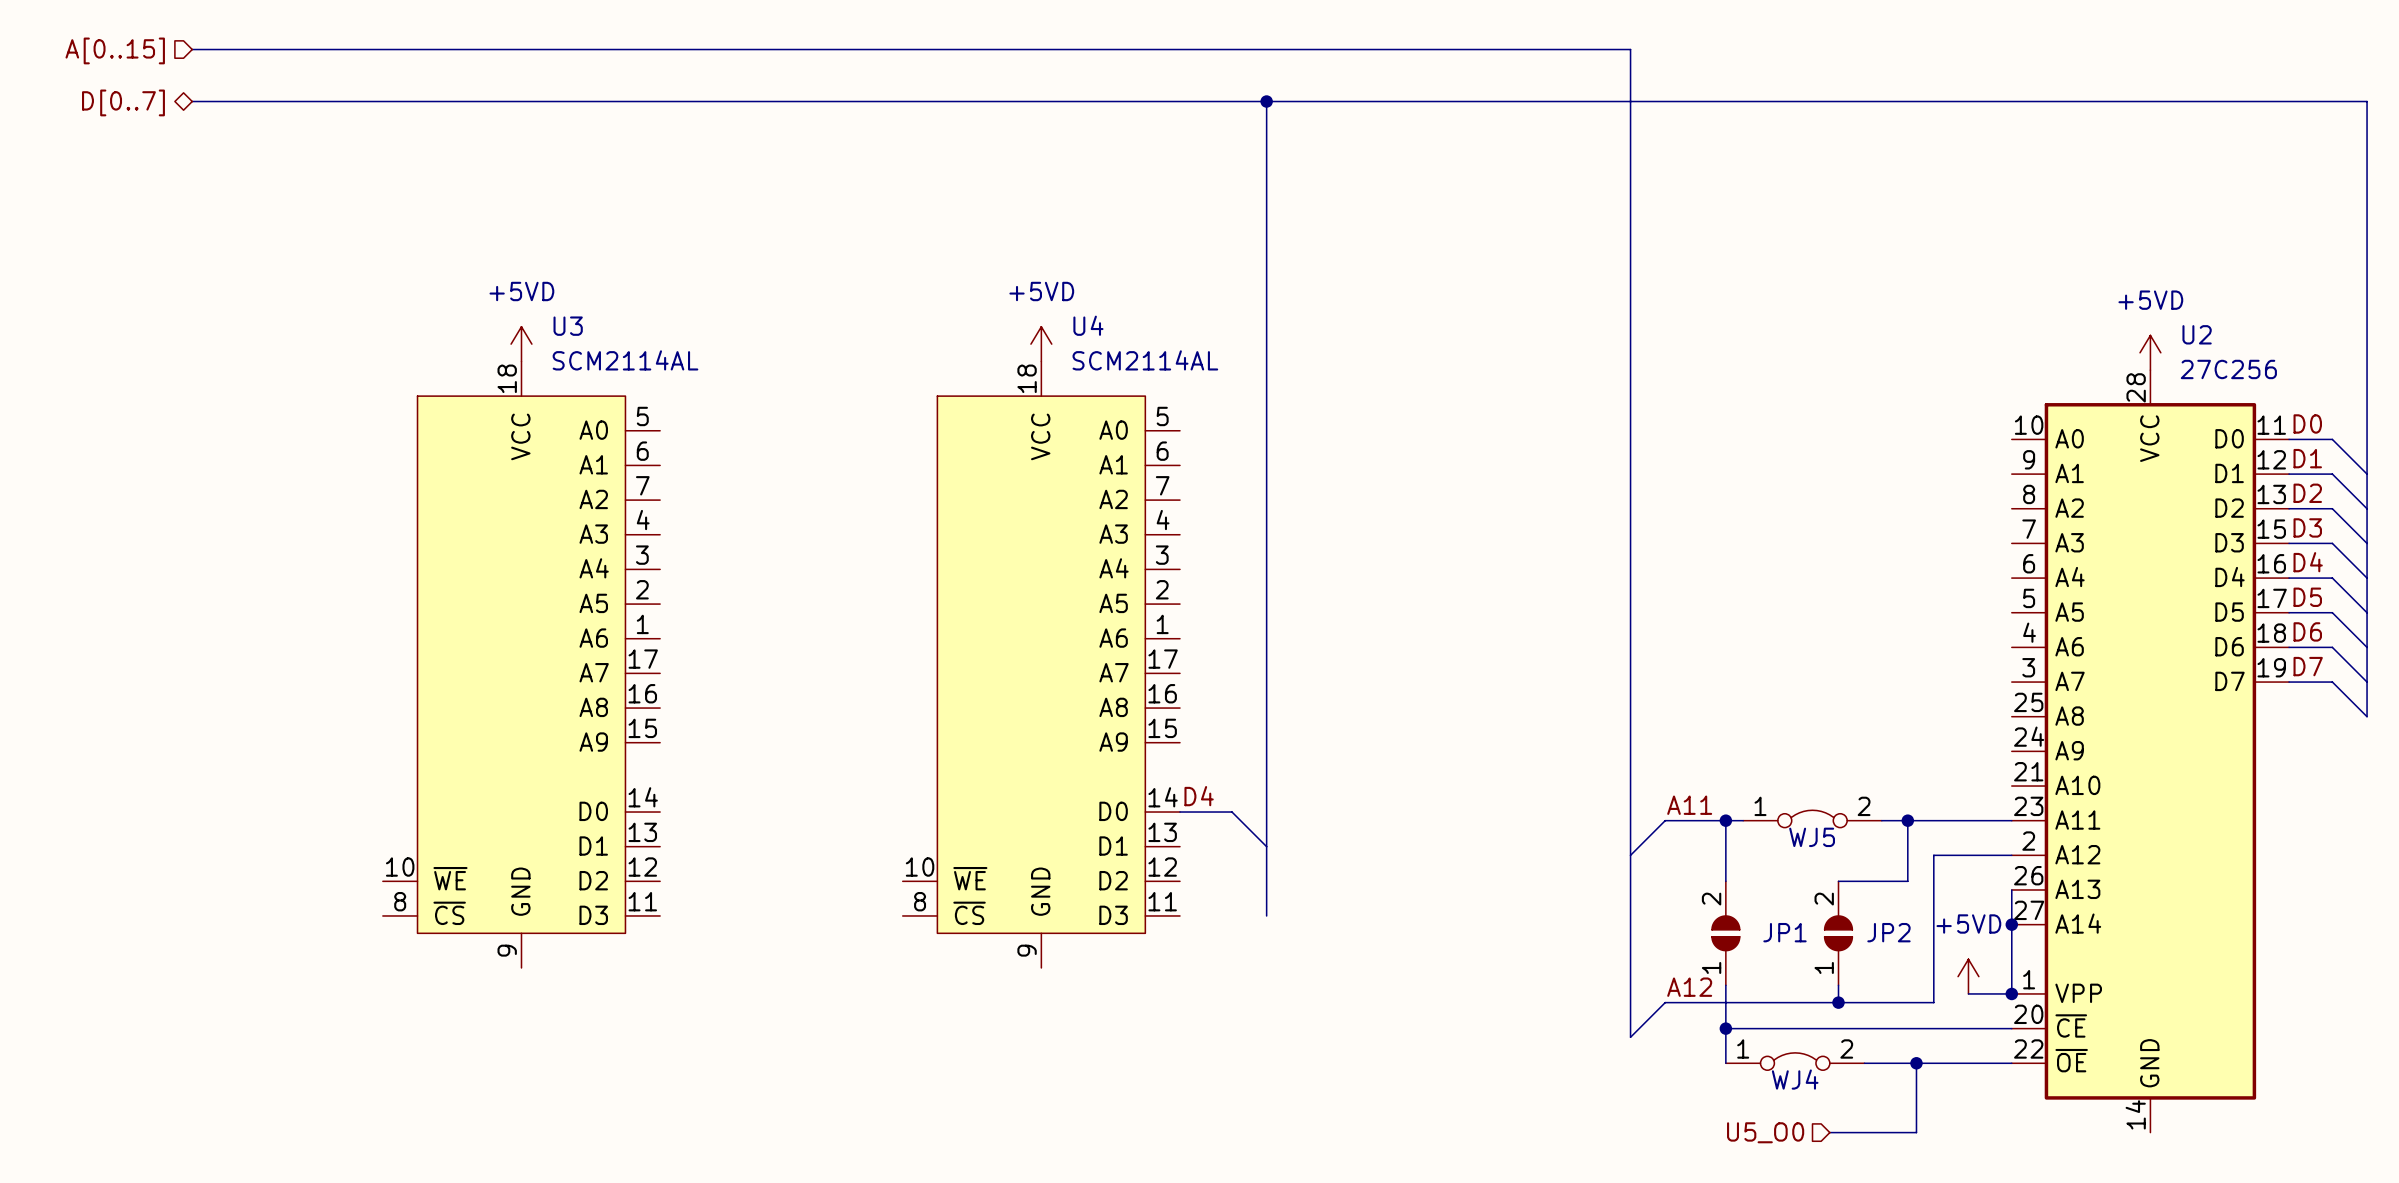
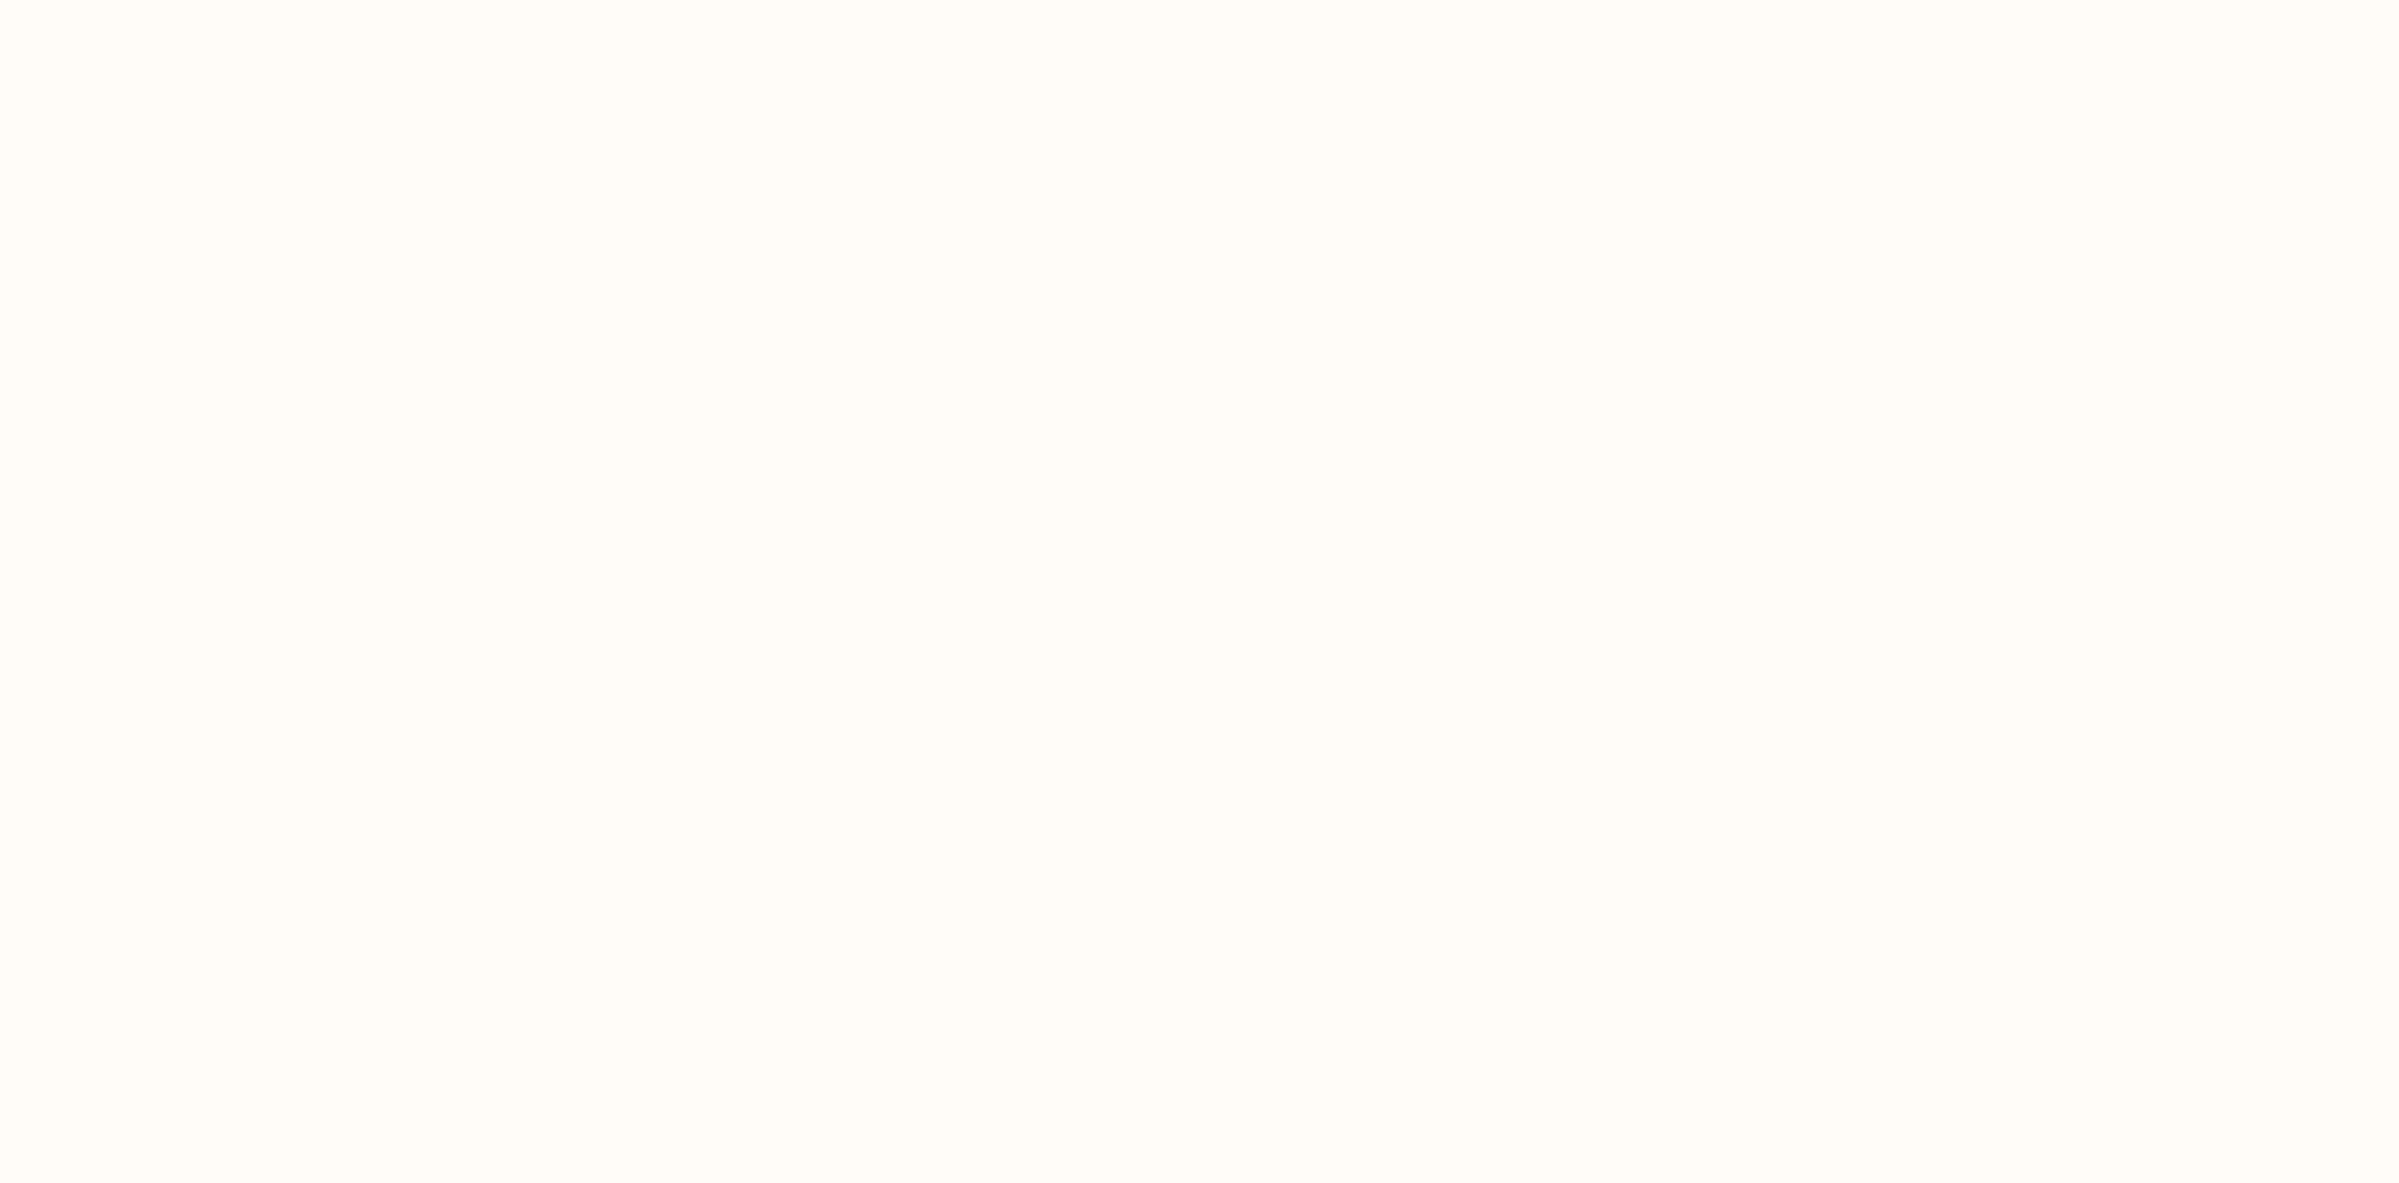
bus: (192, 49) (1630, 49) (1630, 1037) -> none
hierarchical label: A[0..15] (115, 50) -> none
bus: (192, 101) (2367, 101) (2367, 716) -> none
bus: (1266, 101) (1266, 915) -> none
junction: (1266, 101) -> none
hierarchical label: D[0..7] (123, 102) -> none
power symbol: +5VD (521, 344) -> none
power symbol: +5VD (1041, 344) -> none
power symbol: +5VD (2150, 352) -> none
label: D0 (2307, 423) -> none
wire: (2289, 439) (2332, 439) (2367, 474) -> none
label: D1 (2307, 458) -> none
wire: (2289, 474) (2332, 474) (2367, 508) -> none
label: D2 (2307, 493) -> none
wire: (2289, 508) (2332, 508) (2367, 543) -> none
label: D3 (2307, 527) -> none
wire: (2289, 543) (2332, 543) (2367, 578) -> none
label: D4 (2308, 562) -> none
wire: (2289, 578) (2332, 578) (2367, 612) -> none
label: D5 (2307, 597) -> none
wire: (2289, 612) (2332, 612) (2367, 647) -> none
label: D6 (2307, 631) -> none
wire: (2289, 647) (2332, 647) (2367, 682) -> none
U3: SCM2114AL (521, 664) -> none
U4: SCM2114AL (1041, 664) -> none
label: D7 (2308, 666) -> none
wire: (2289, 682) (2332, 682) (2367, 716) -> none
U2: 27C256 (2150, 751) -> none
label: D4 (1199, 796) -> none
label: A11 (1689, 805) -> none
wire: (1179, 812) (1231, 812) (1266, 846) -> none
WJ5: (1812, 818) -> none
wire: (1725, 820) (1725, 881) -> none
junction: (1725, 820) -> none
wire: (1743, 820) (1665, 820) (1630, 855) -> none
wire: (1881, 820) (2011, 820) -> none
wire: (1907, 820) (1907, 881) (1838, 881) -> none
junction: (1907, 820) -> none
wire: (2011, 855) (1933, 855) (1933, 1002) (1665, 1002) (1630, 1037) -> none
wire: (2011, 889) (2011, 993) (1968, 993) -> none
junction: (2011, 924) -> none
JP1: (1725, 933) -> none
JP2: (1838, 933) -> none
power symbol: +5VD (1968, 976) -> none
wire: (1725, 985) (1725, 1063) -> none
wire: (1838, 985) (1838, 1002) -> none
label: A12 (1689, 987) -> none
junction: (2011, 993) -> none
junction: (1838, 1002) -> none
wire: (1725, 1028) (2011, 1028) -> none
junction: (1725, 1028) -> none
WJ4: (1795, 1061) -> none
wire: (1864, 1063) (2011, 1063) -> none
wire: (1916, 1063) (1916, 1132) (1829, 1132) -> none
junction: (1916, 1063) -> none
hierarchical label: U5_O0 (1765, 1132) -> none

